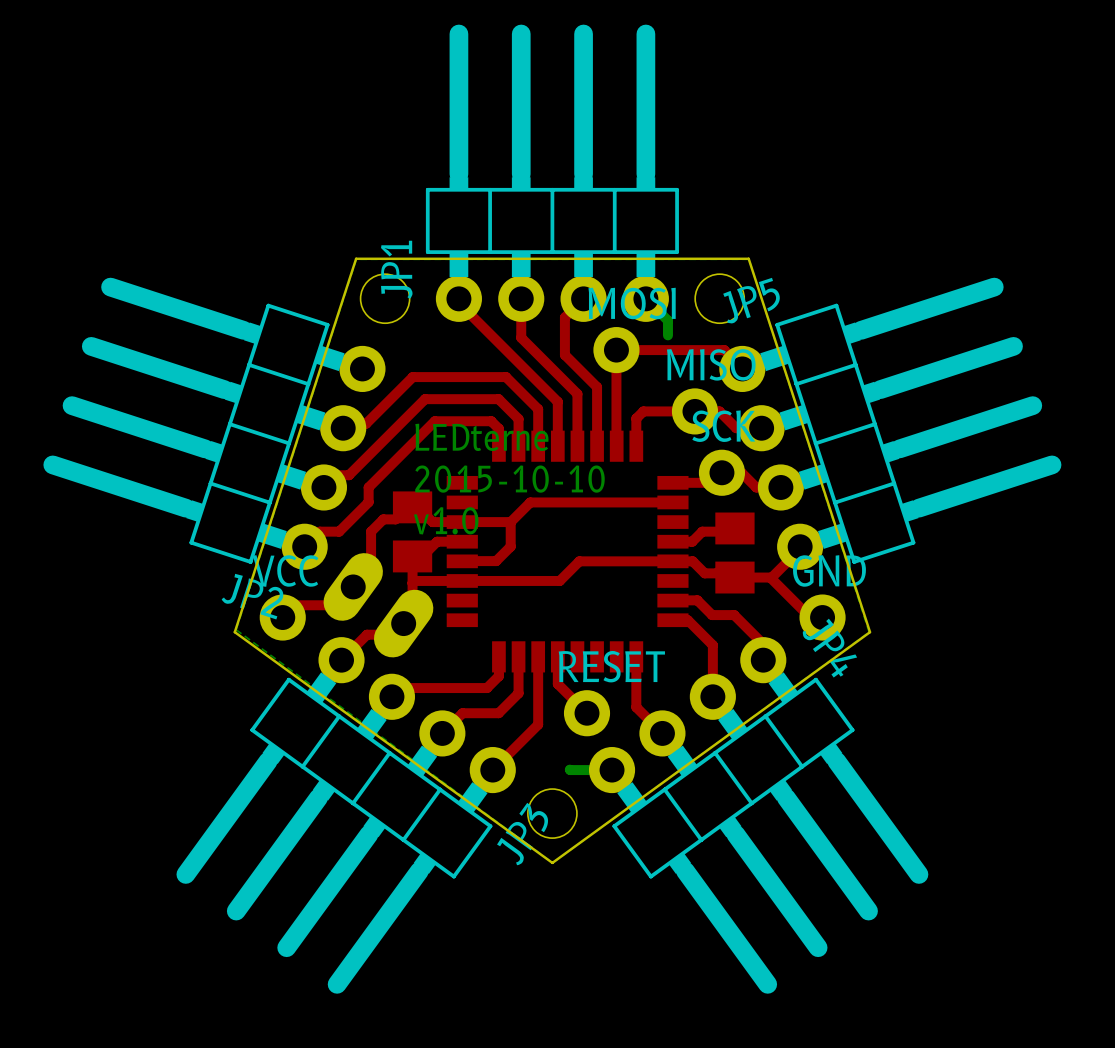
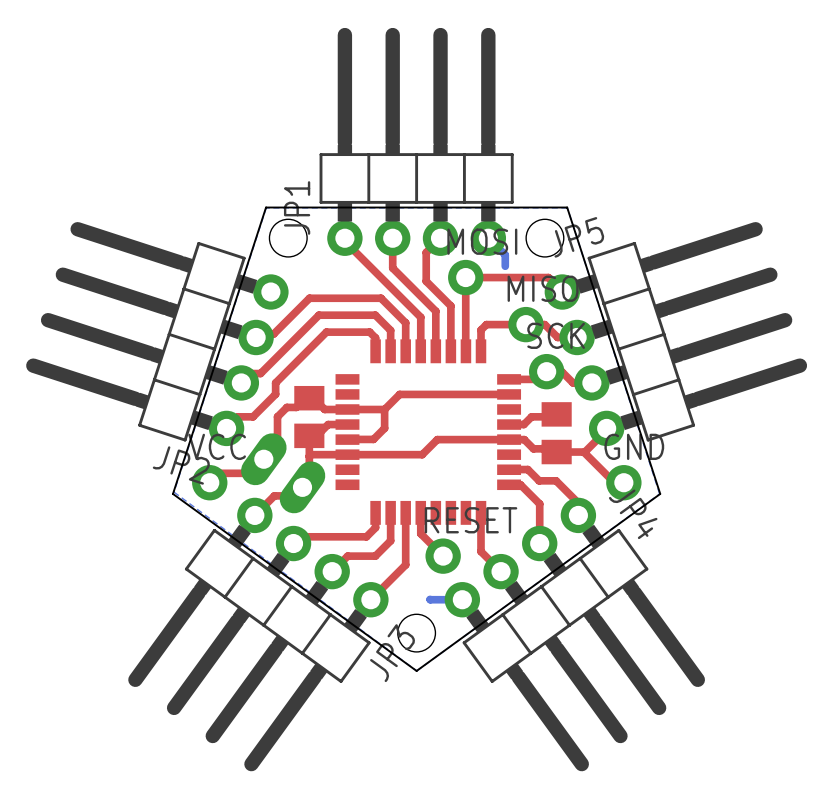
text: LEDterne (481, 437) -> none
text: 2015-10-10 (509, 479) -> none
text: v1.0 (446, 520) -> none

